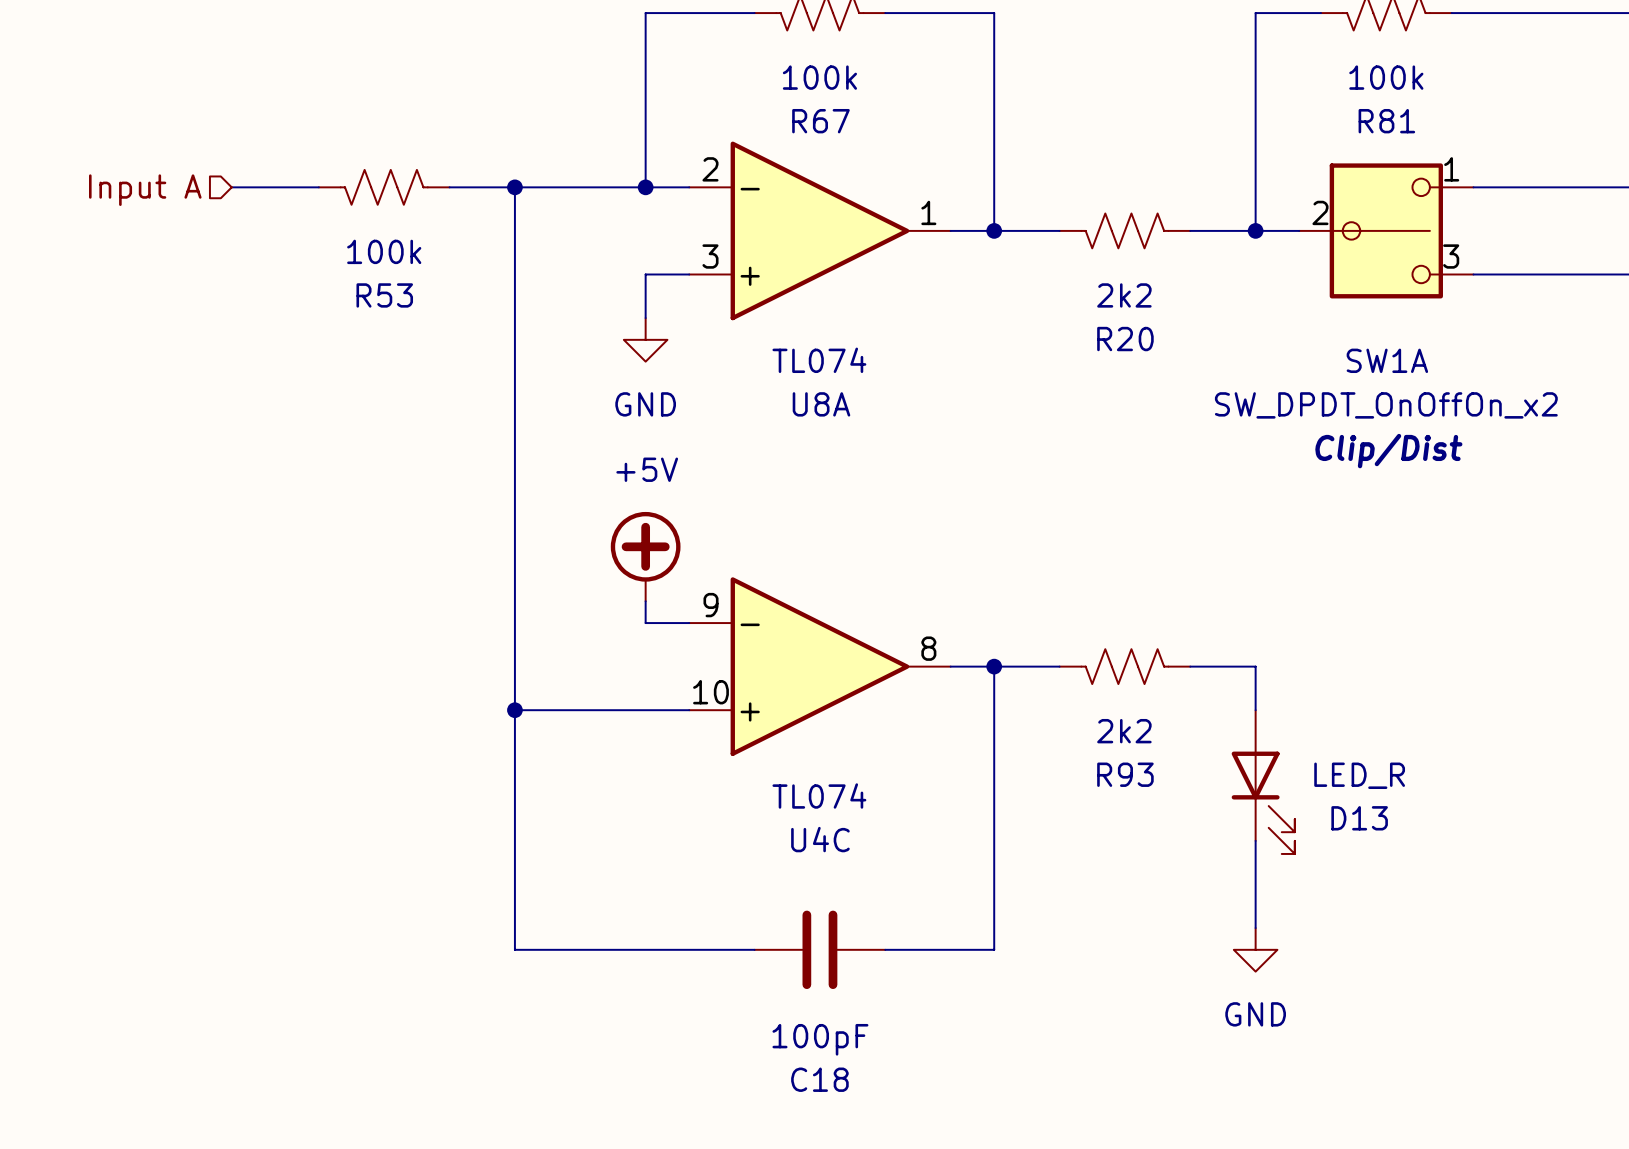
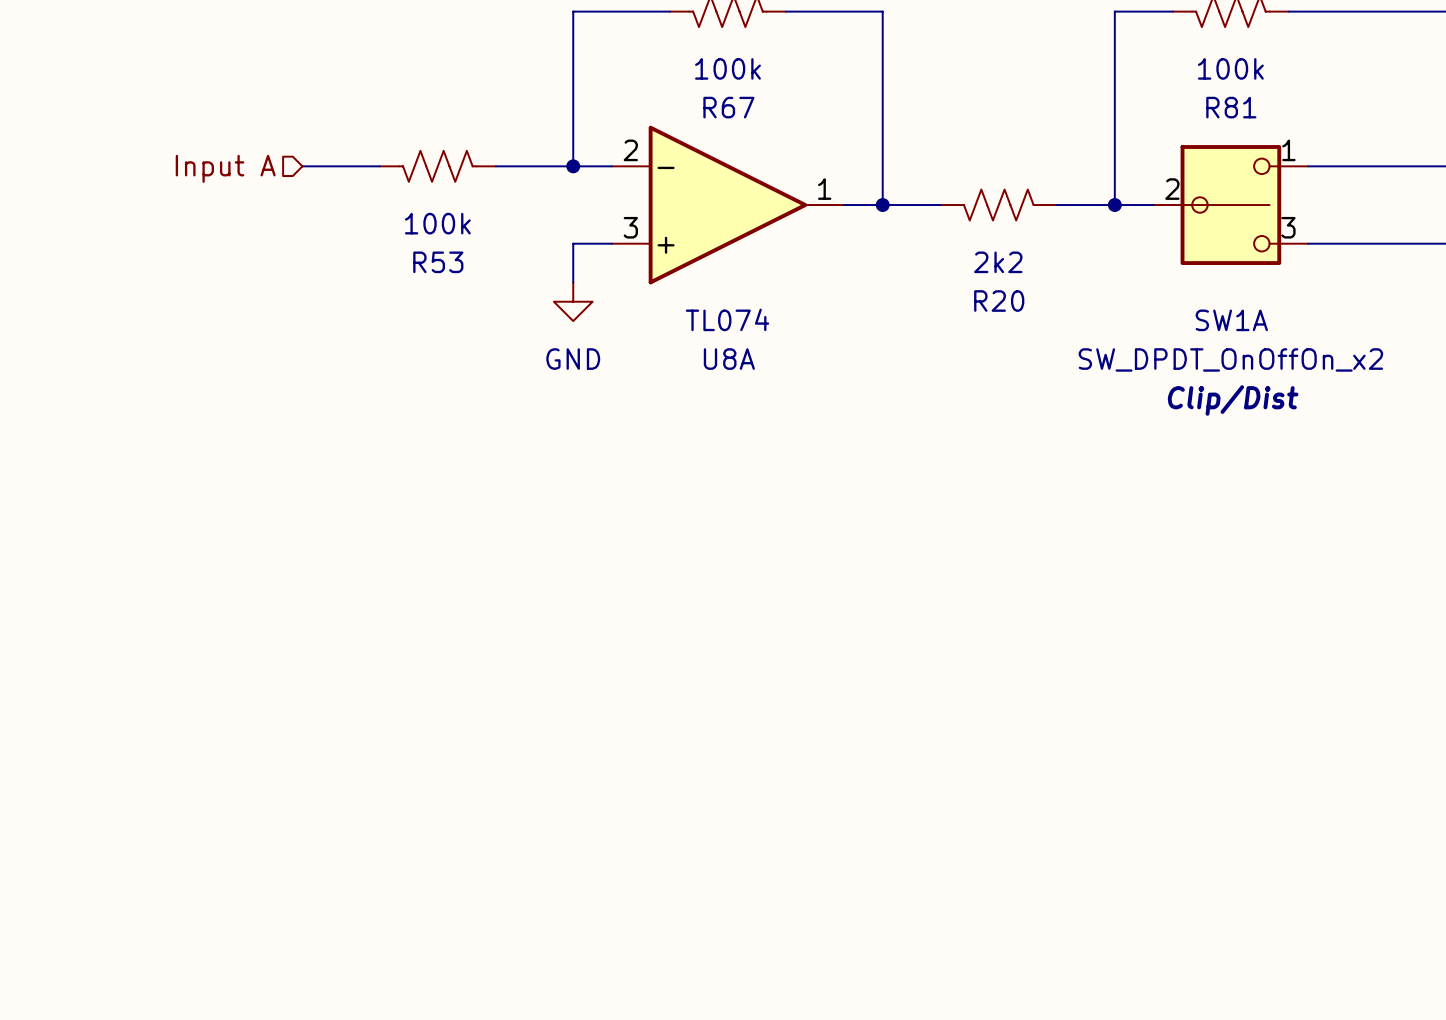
wire: (231, 187) (318, 187) -> (302, 166) (379, 166)
R53 position: (384, 187) -> (437, 166)
wire: (449, 187) (558, 187) -> none
wire: (514, 187) (514, 949) (754, 949) -> none
junction: (514, 187) -> none
hierarchical label position: Input A (145, 190) -> Input A (225, 168)
power symbol: +5V (645, 556) -> none
wire: (645, 601) (645, 623) (689, 623) -> none
U4C: TL074 (819, 666) -> none
wire: (950, 666) (1059, 666) -> none
wire: (994, 666) (994, 949) (885, 949) -> none
junction: (994, 666) -> none
R93: 2k2 (1124, 666) -> none
wire: (1190, 666) (1255, 666) (1255, 710) -> none
wire: (514, 710) (689, 710) -> none
junction: (514, 710) -> none
D13: LED_R (1263, 782) -> none
wire: (1255, 840) (1255, 928) -> none
C18: 100pF (819, 949) -> none
power symbol: GND (1255, 949) -> none

